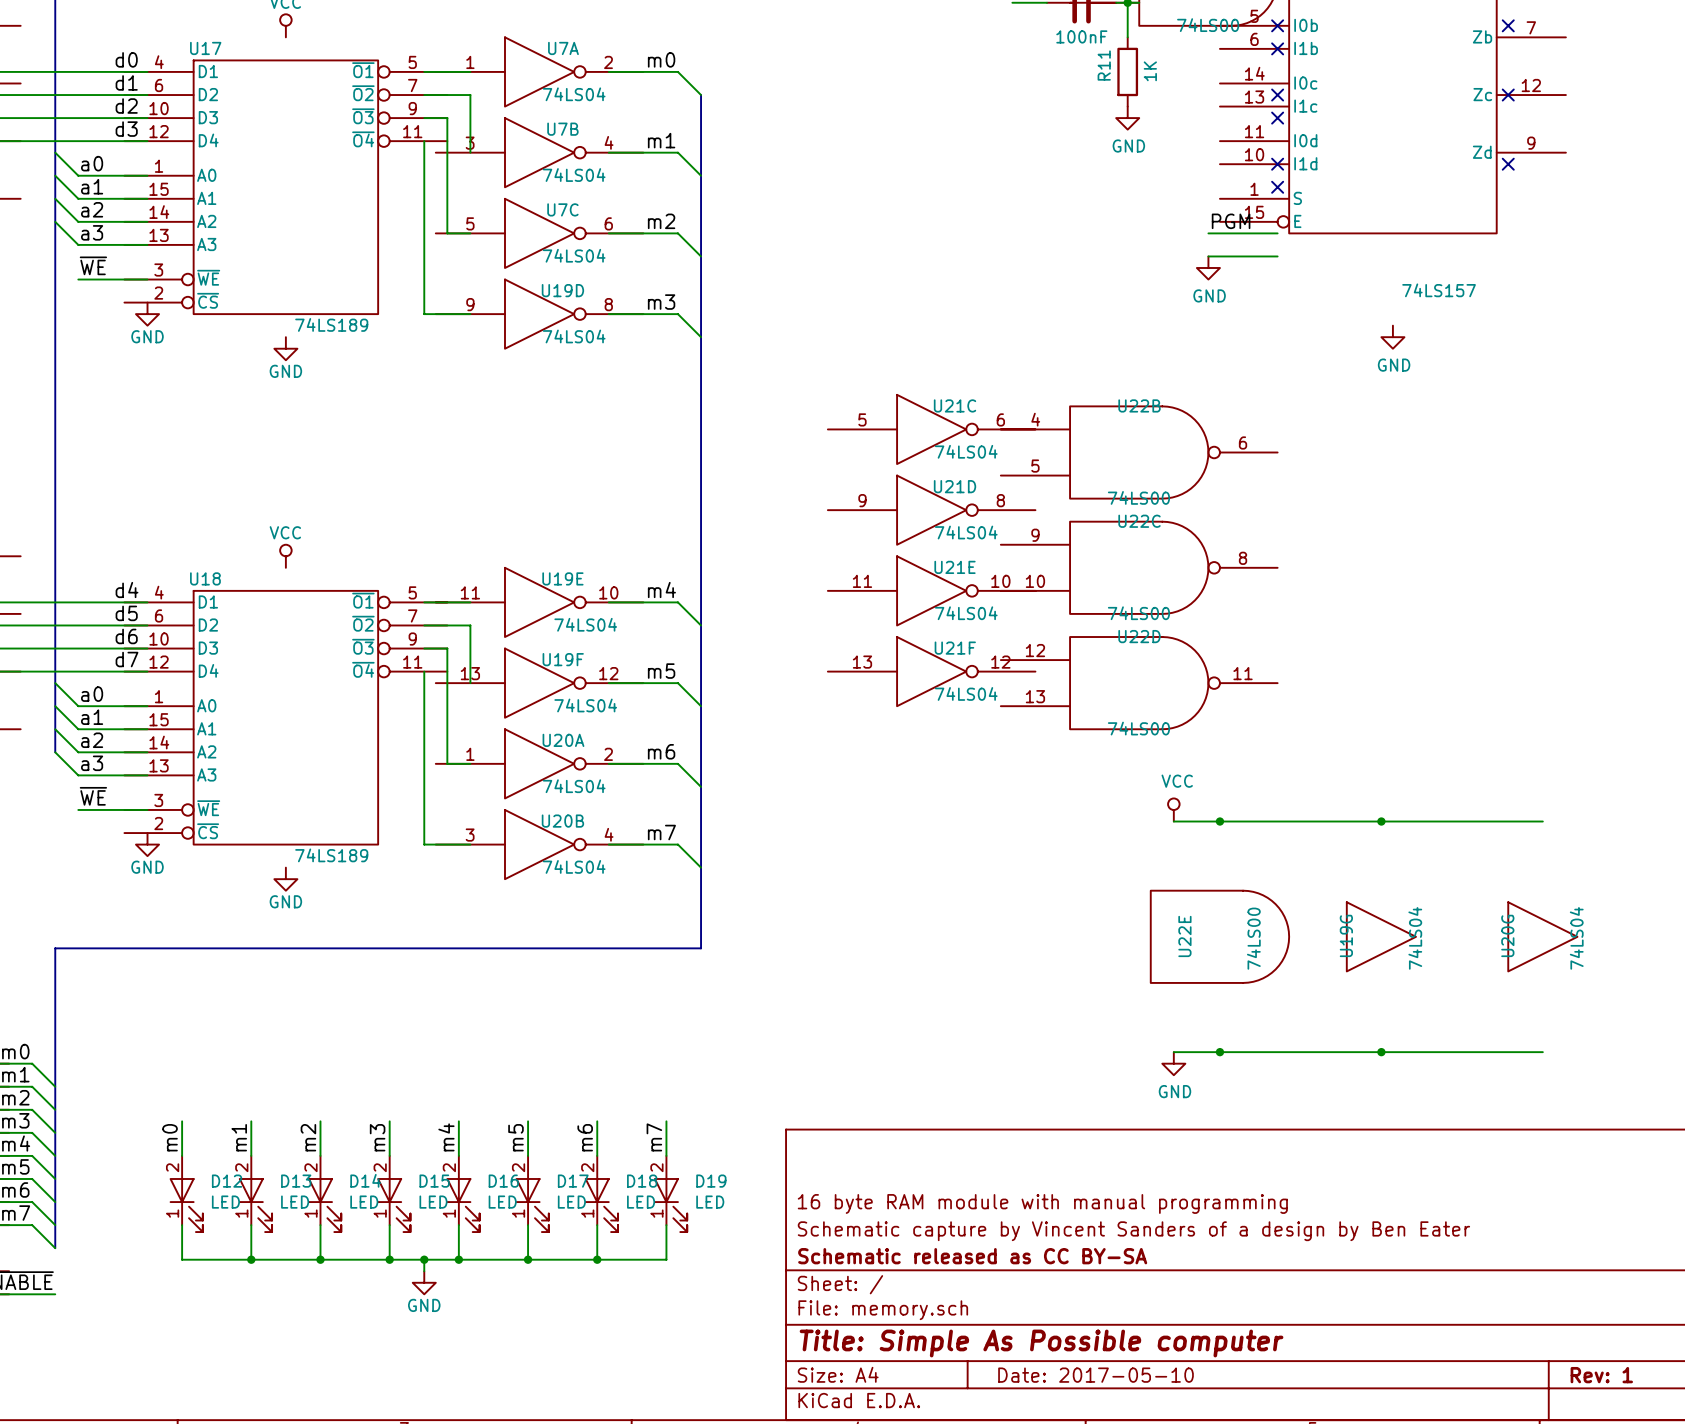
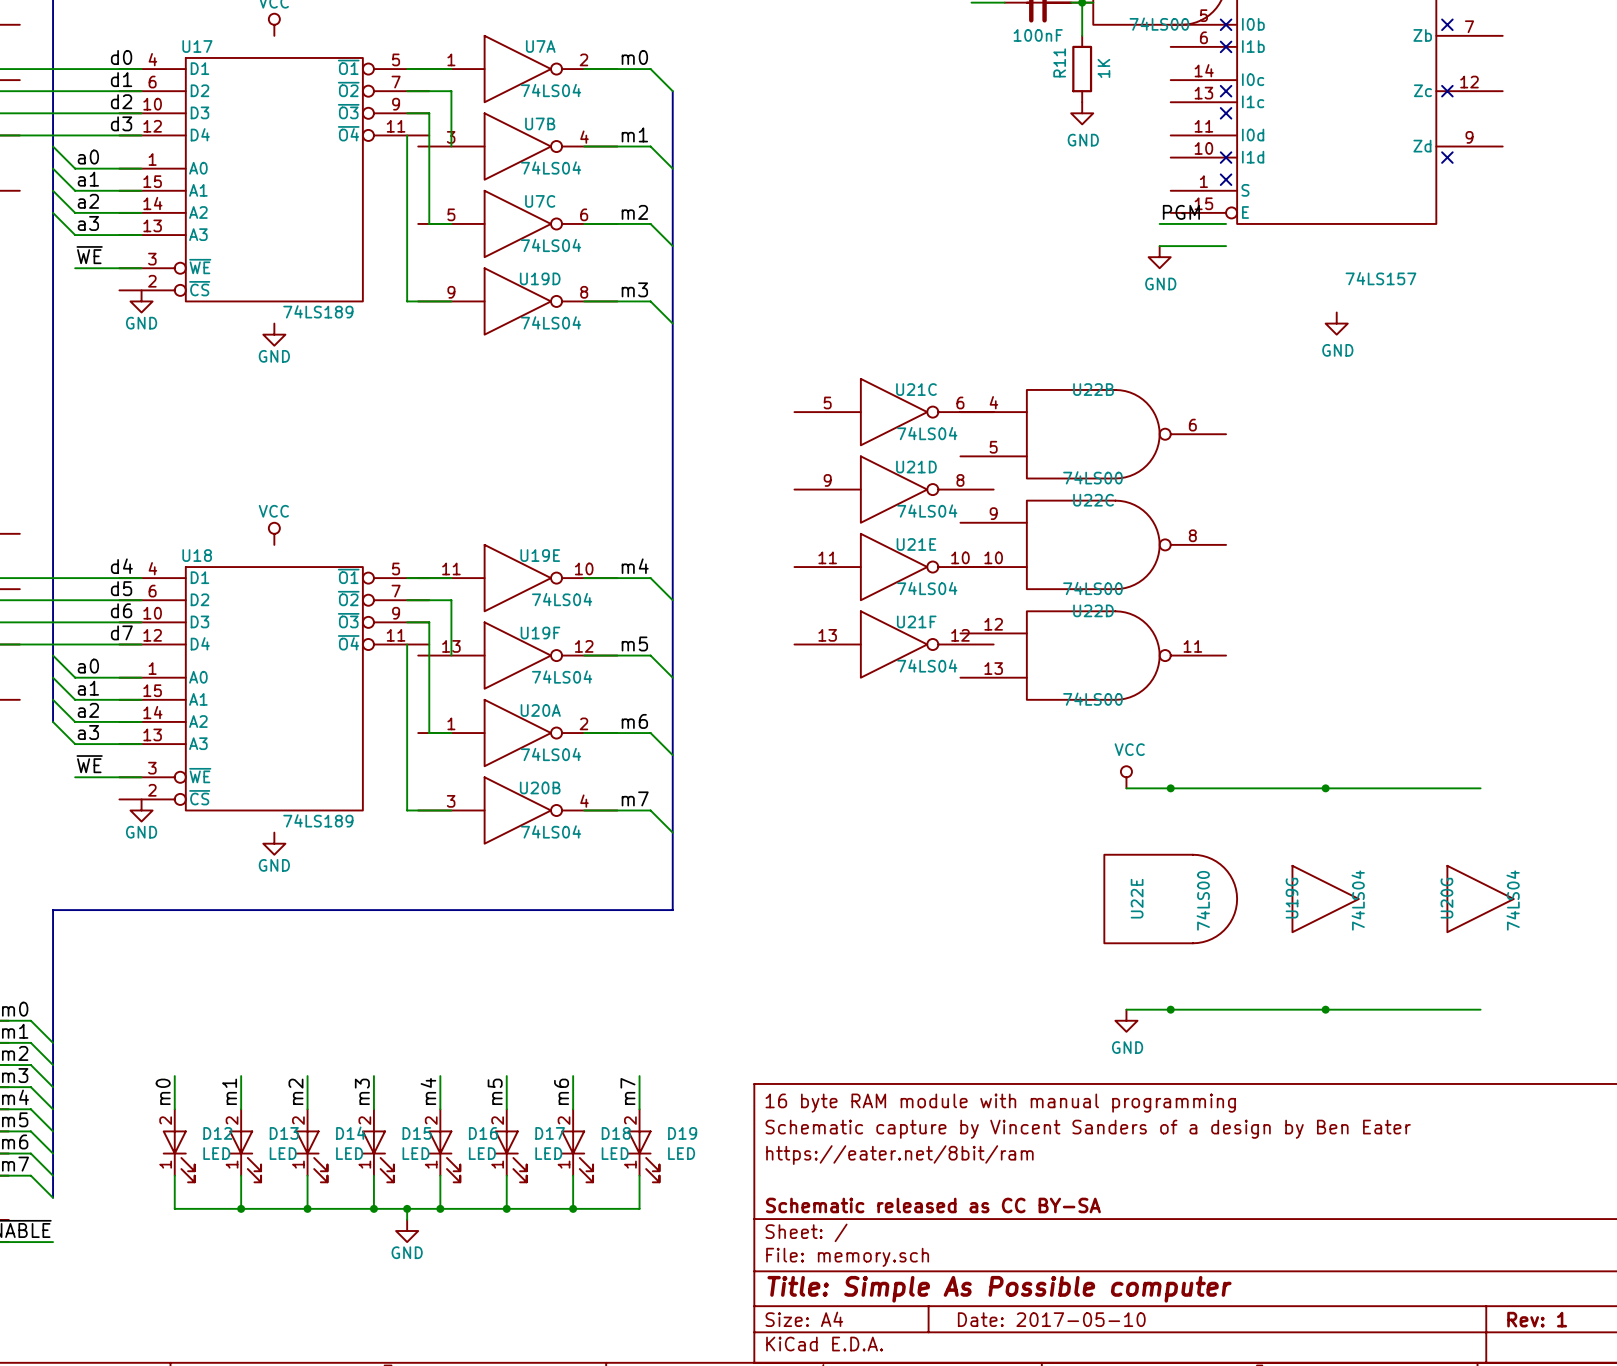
title block: none -> 16 byte RAM module with manual programming (1000, 1103)
title block: 16 byte RAM module with manual programming (1042, 1203) -> https://eater.net/8bit/ram (899, 1155)
title block position: Schematic capture by Vincent Sanders of a design by Ben Eater (1133, 1231) -> Schematic capture by Vincent Sanders of a design by Ben Eater (1088, 1129)

